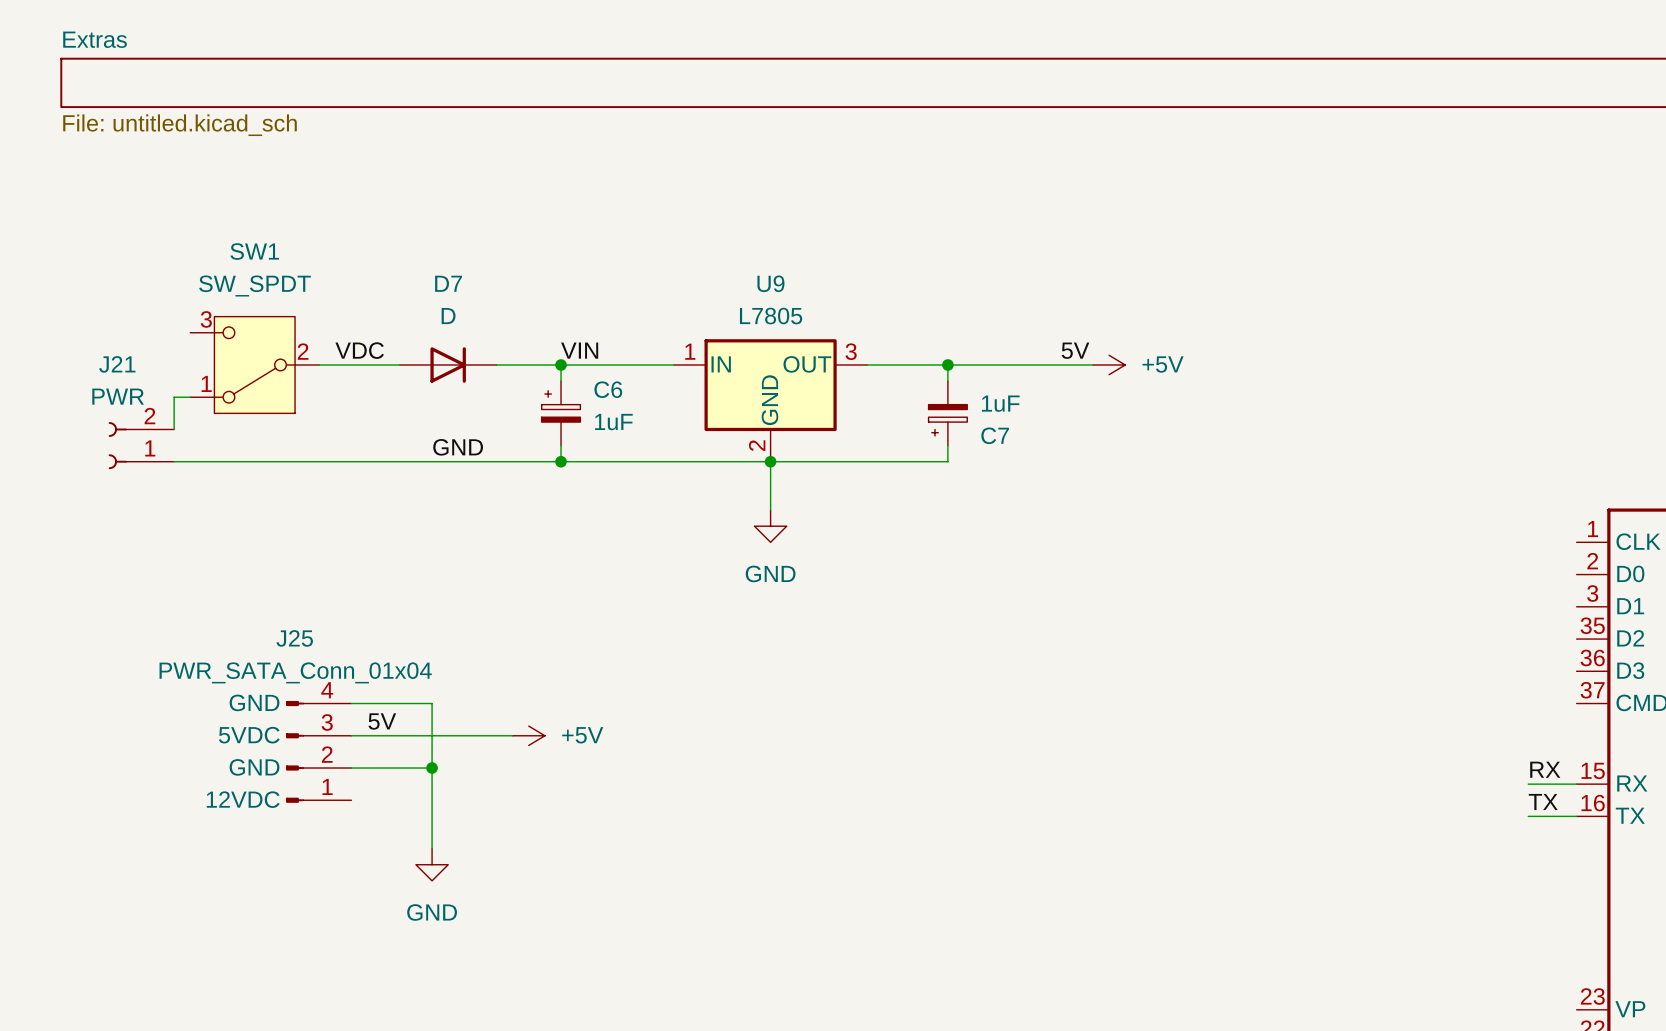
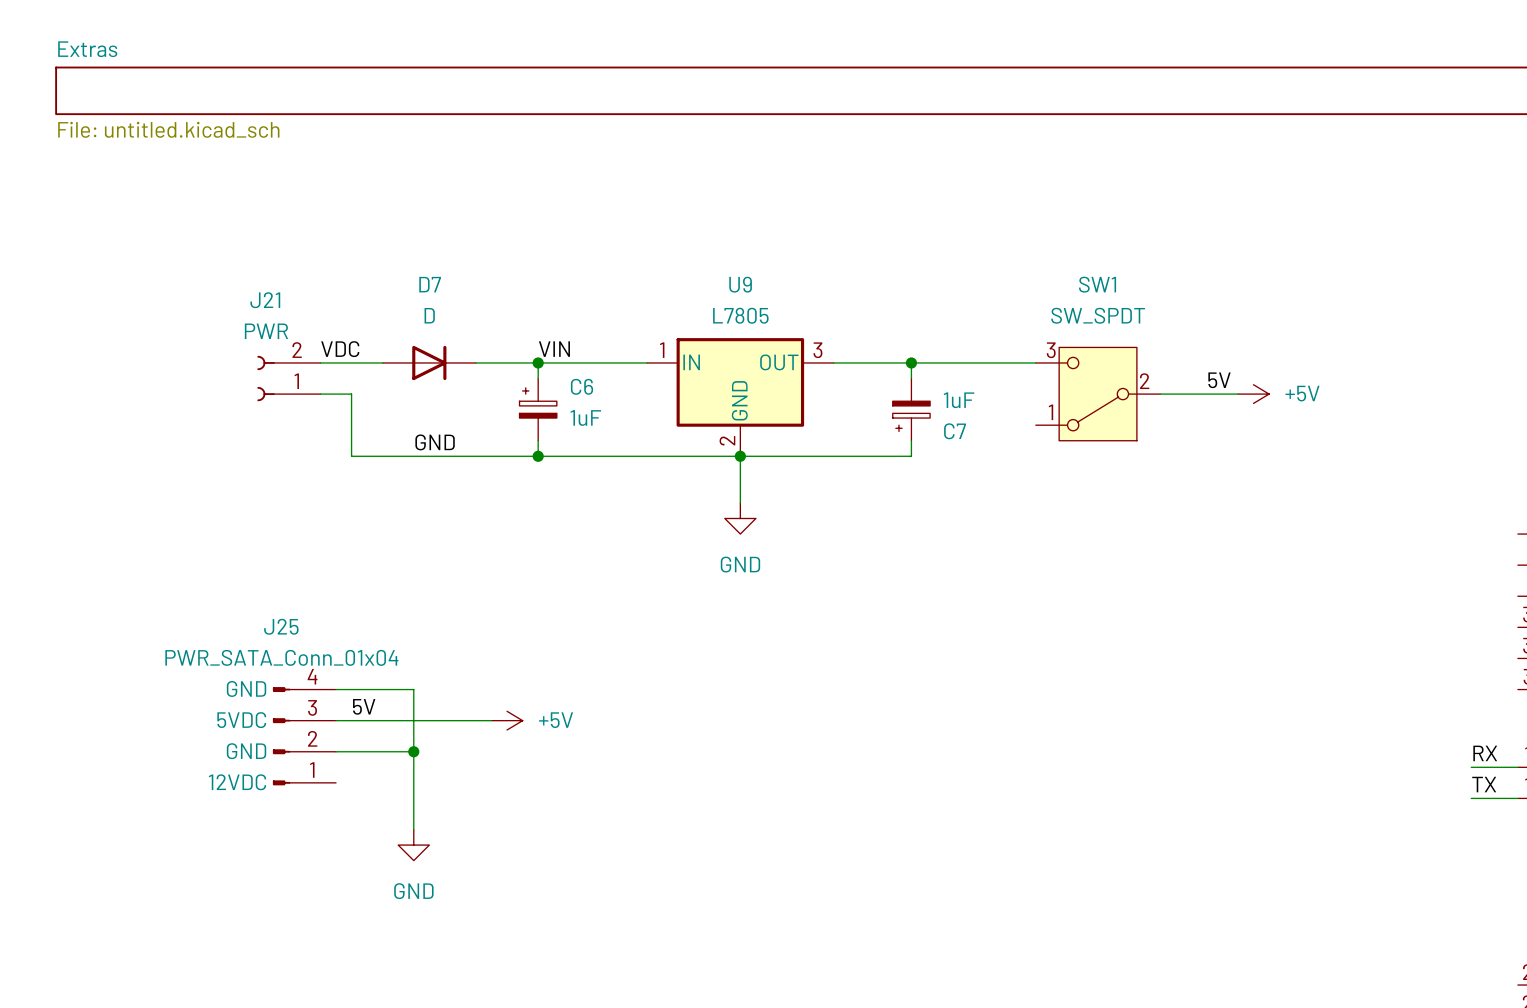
label position: 5V (1075, 350) -> 5V (1219, 380)
SW1 position: (254, 364) -> (1098, 394)
power symbol position: +5V (1109, 364) -> +5V (1253, 394)
wire: (190, 397) (174, 397) (174, 429) -> none
wire: none -> (1160, 394) (1237, 394)
J21 position: (141, 445) -> (288, 378)
wire: (174, 461) (367, 461) -> (320, 394) (351, 394) (351, 456)

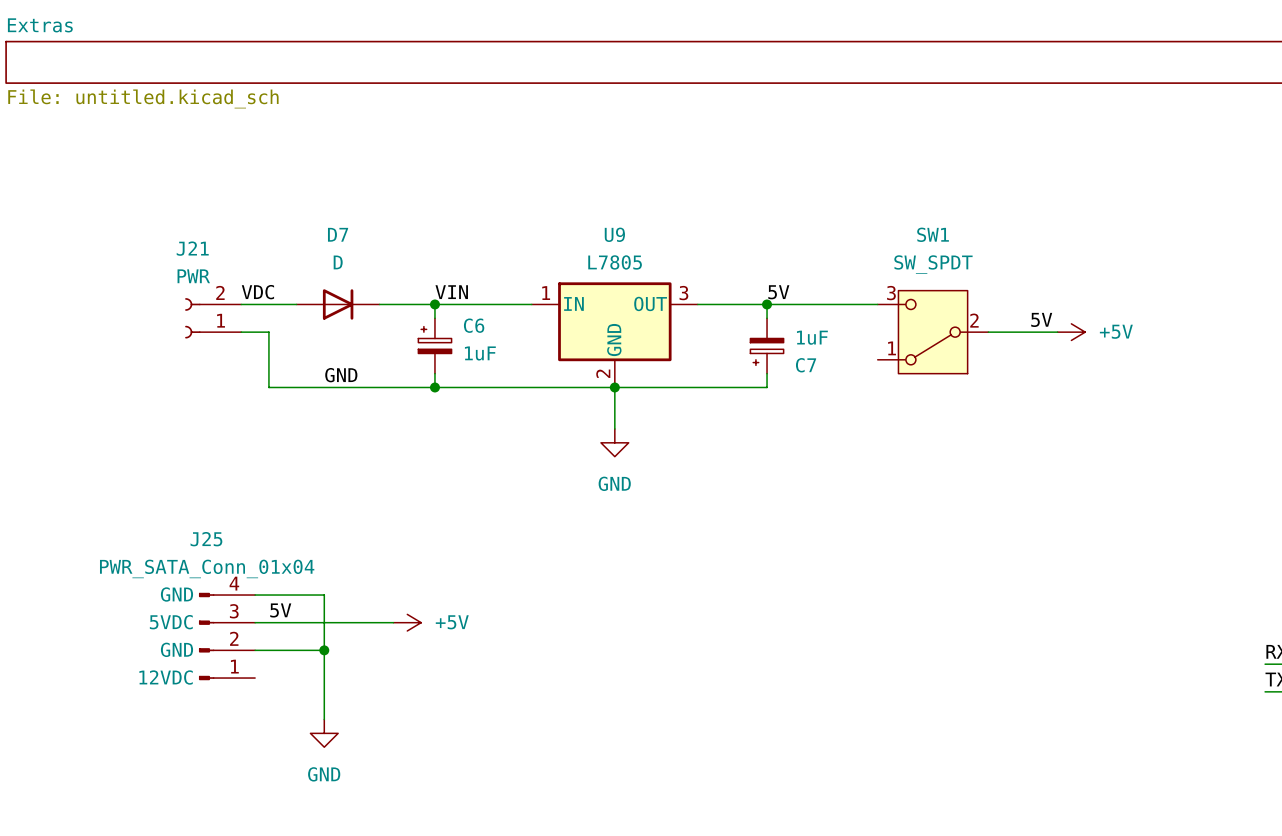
label: none -> 5V (778, 292)

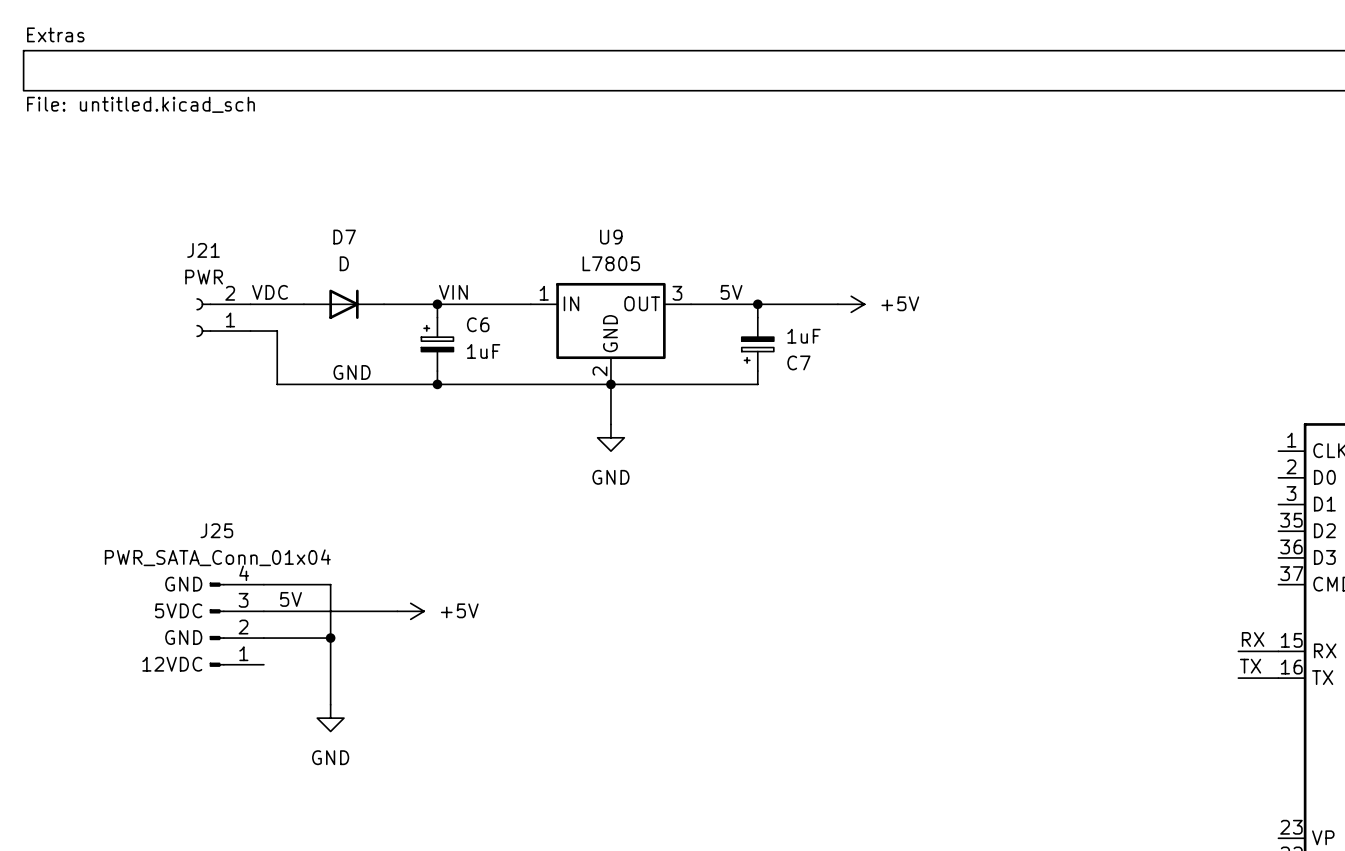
label position: 5V (778, 292) -> 5V (731, 292)
label: 5V (1041, 319) -> none
SW1: SW_SPDT (933, 332) -> none
wire: (988, 332) (1057, 332) -> none
power symbol position: +5V (1071, 332) -> +5V (851, 304)

